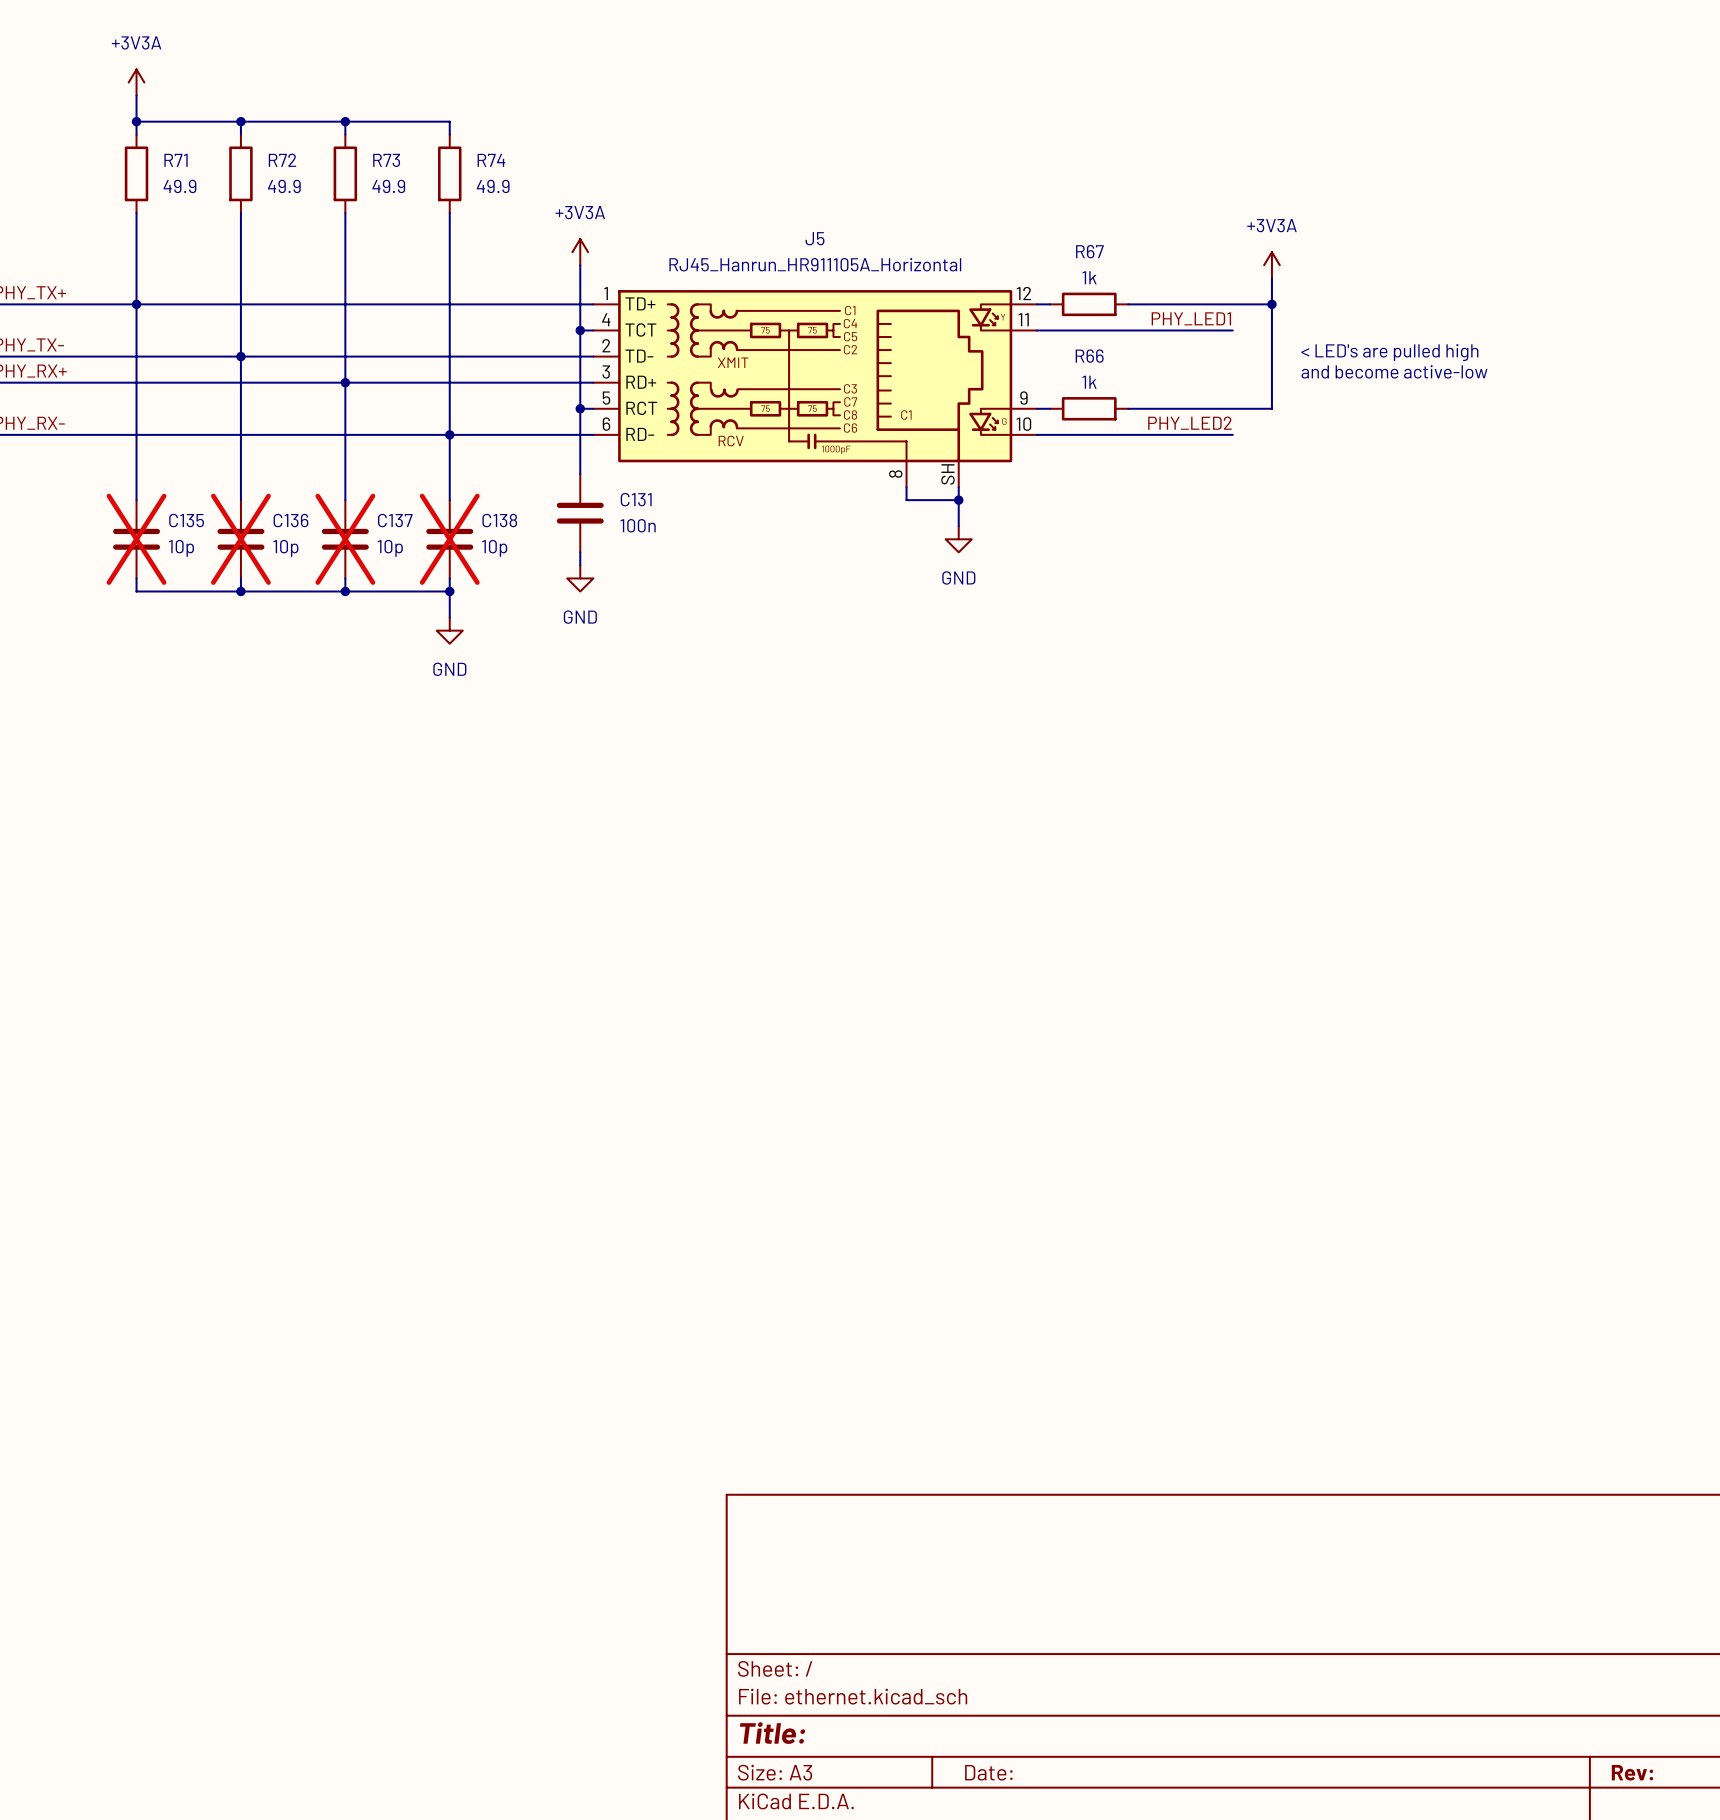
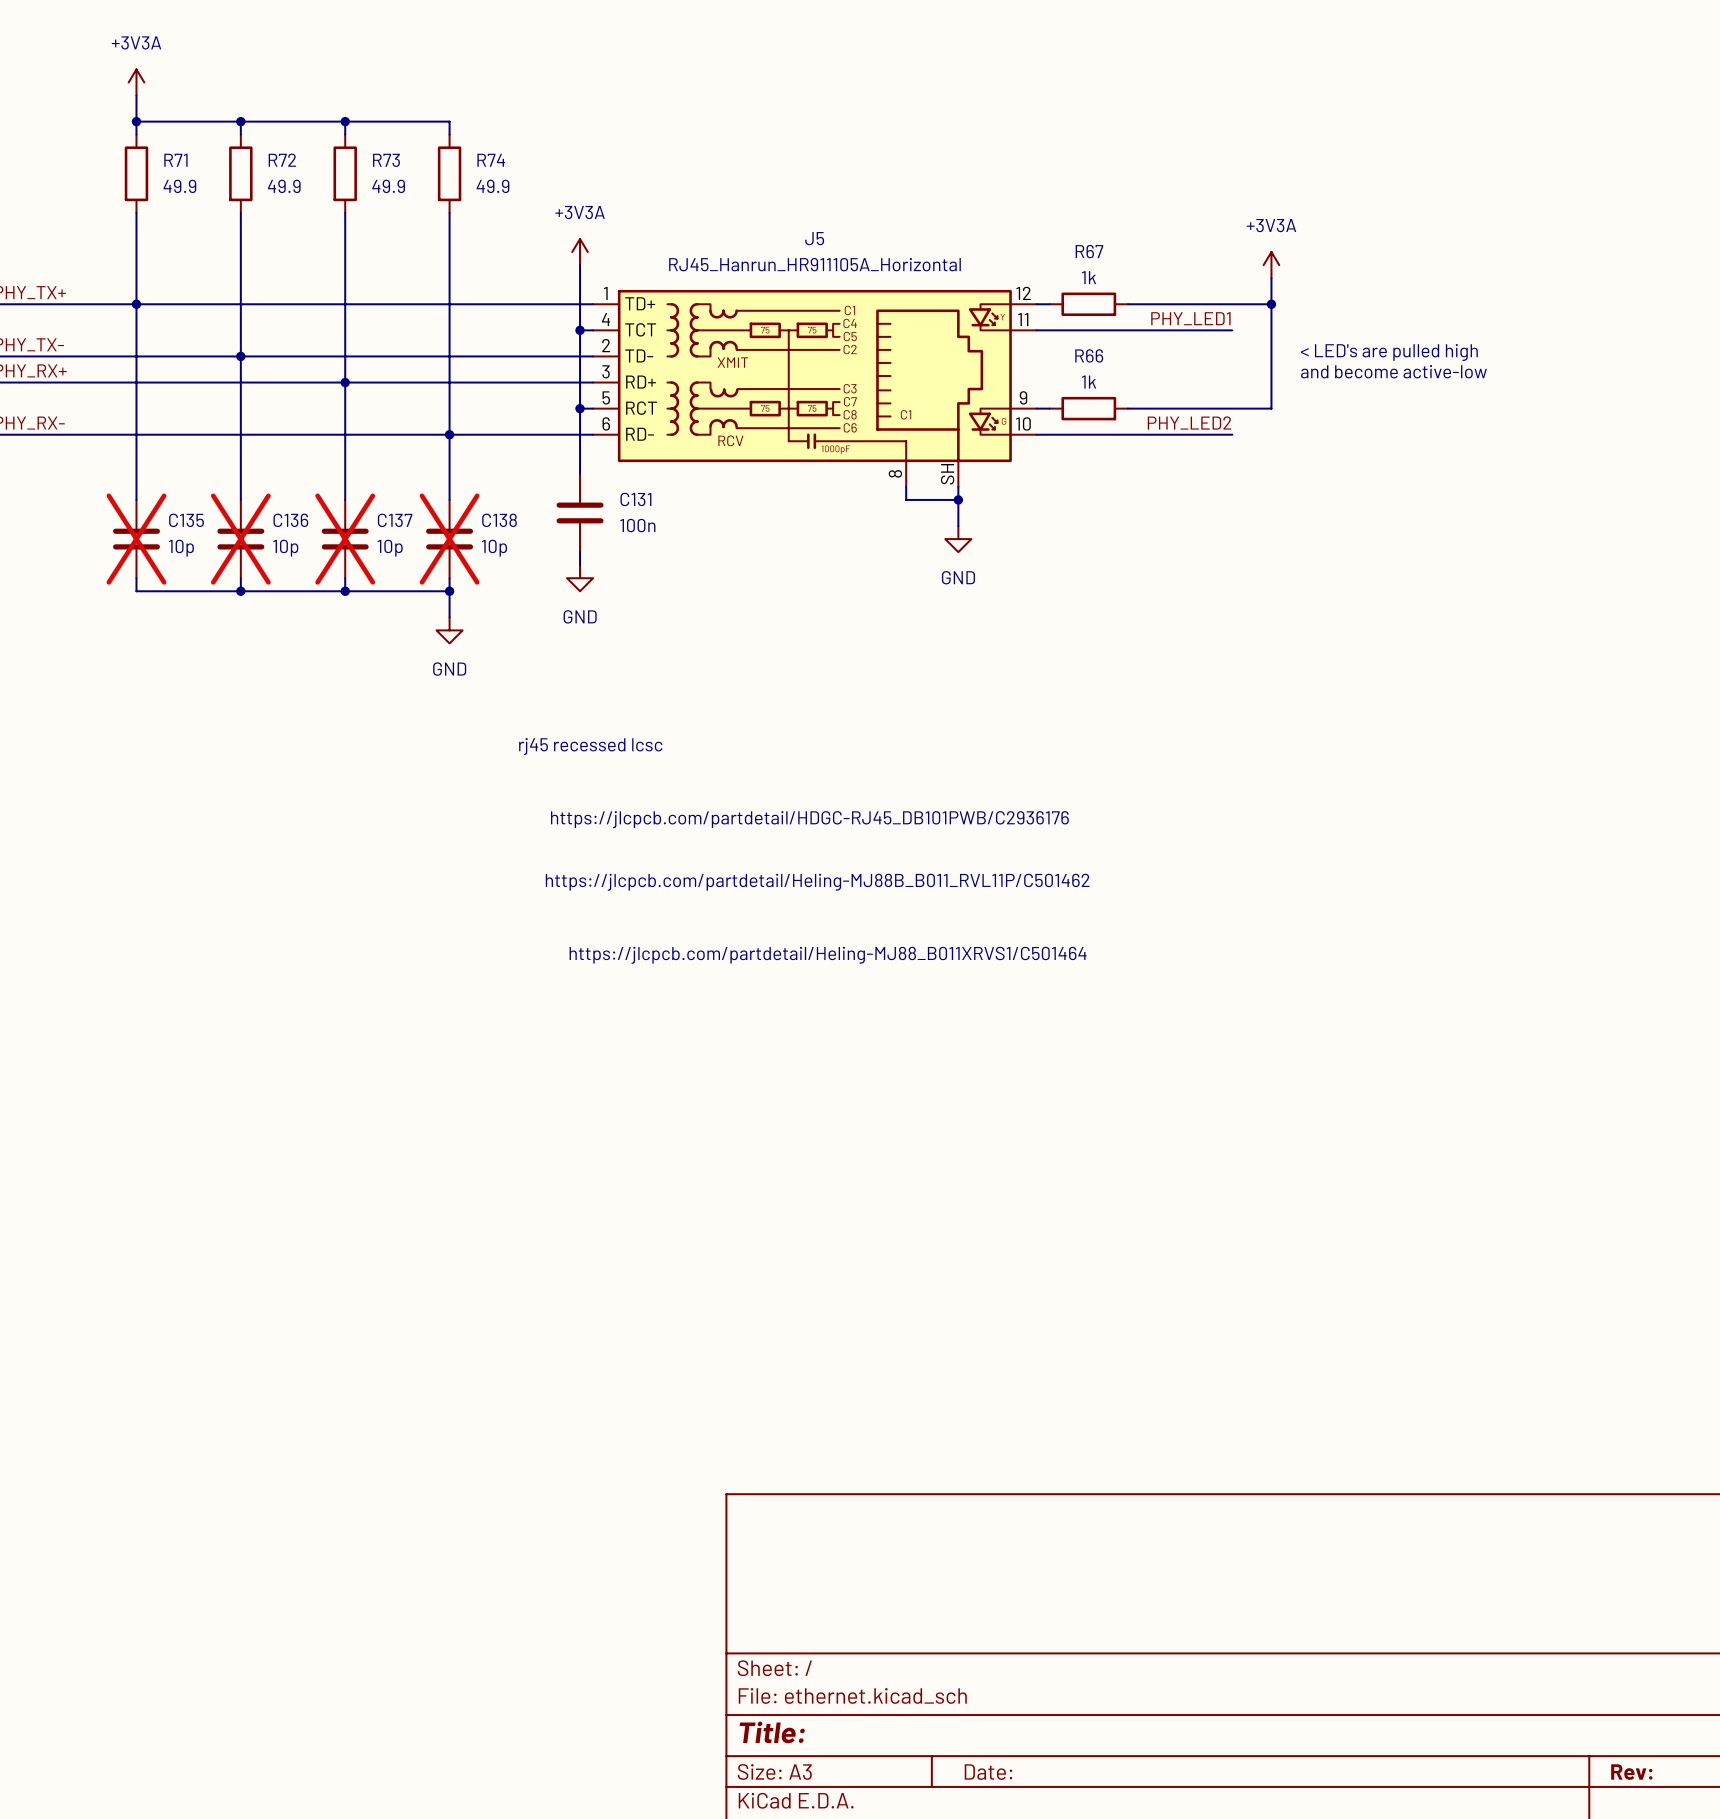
text: none -> rj45 recessed lcsc (590, 746)
text: none -> https://jlcpcb.com/partdetail/HDGC-RJ45_DB101PWB/C2936176 (809, 819)
text: none -> https://jlcpcb.com/partdetail/Heling-MJ88B_B011_RVL11P/C501462 (817, 882)
text: none -> https://jlcpcb.com/partdetail/Heling-MJ88_B011XRVS1/C501464 (828, 955)

